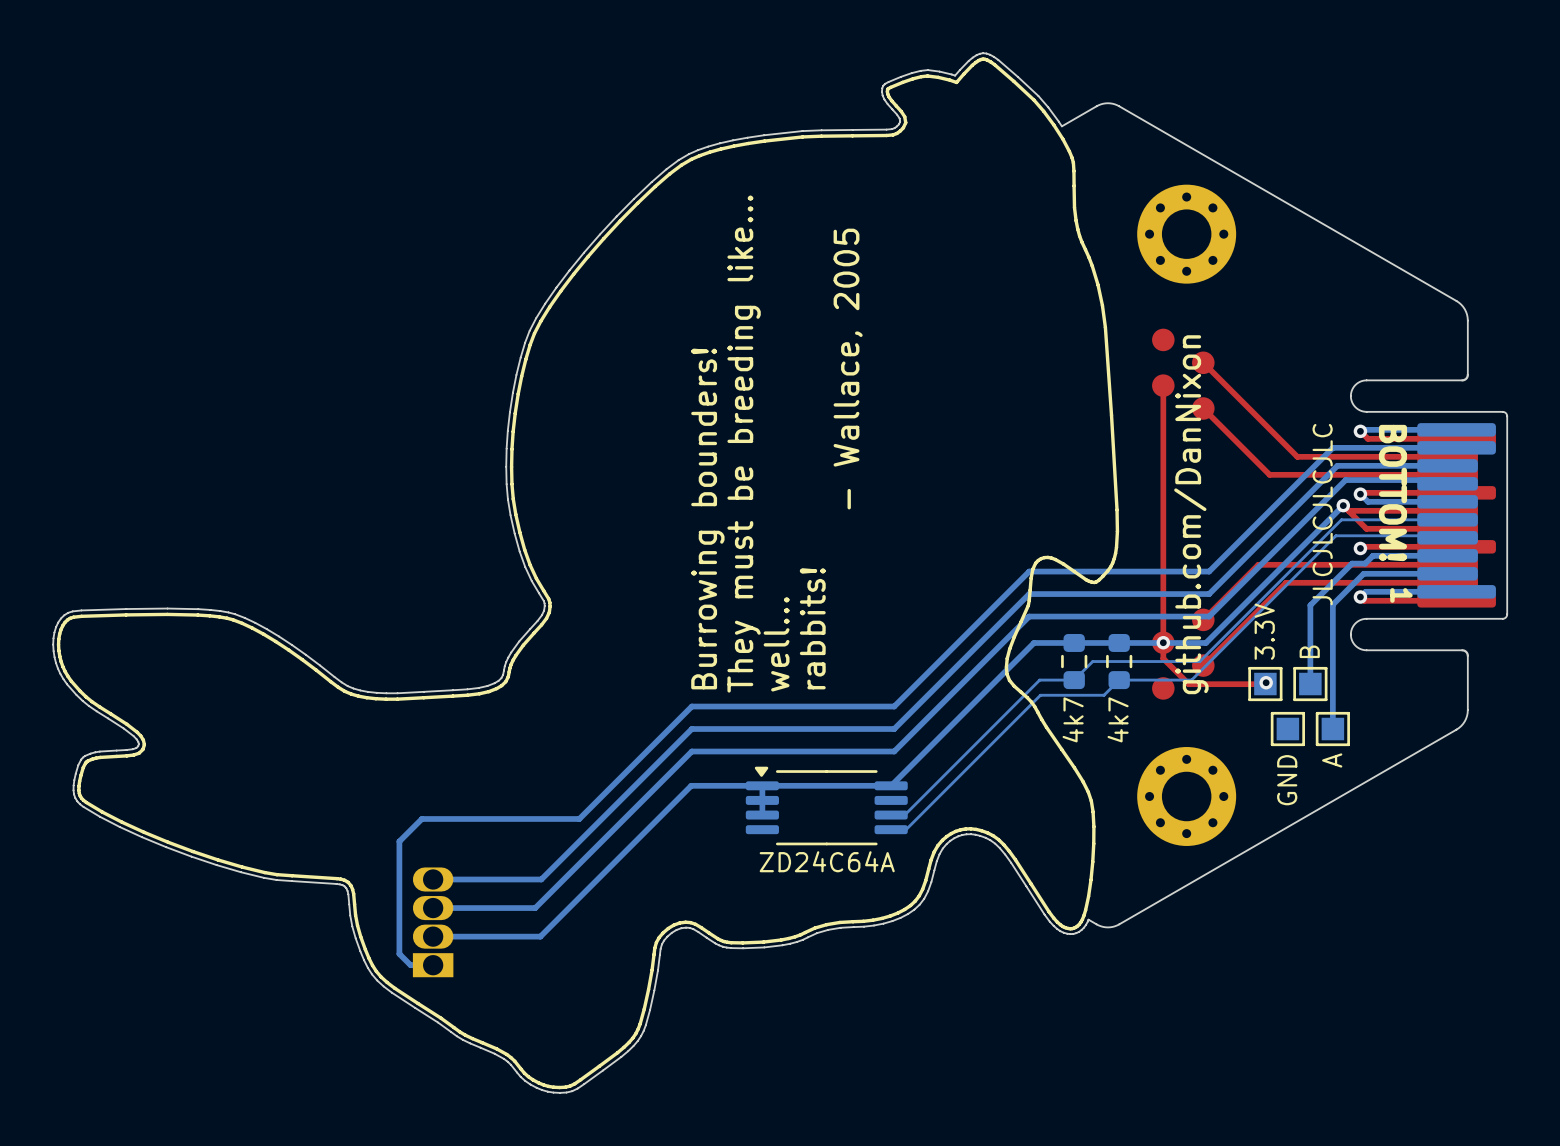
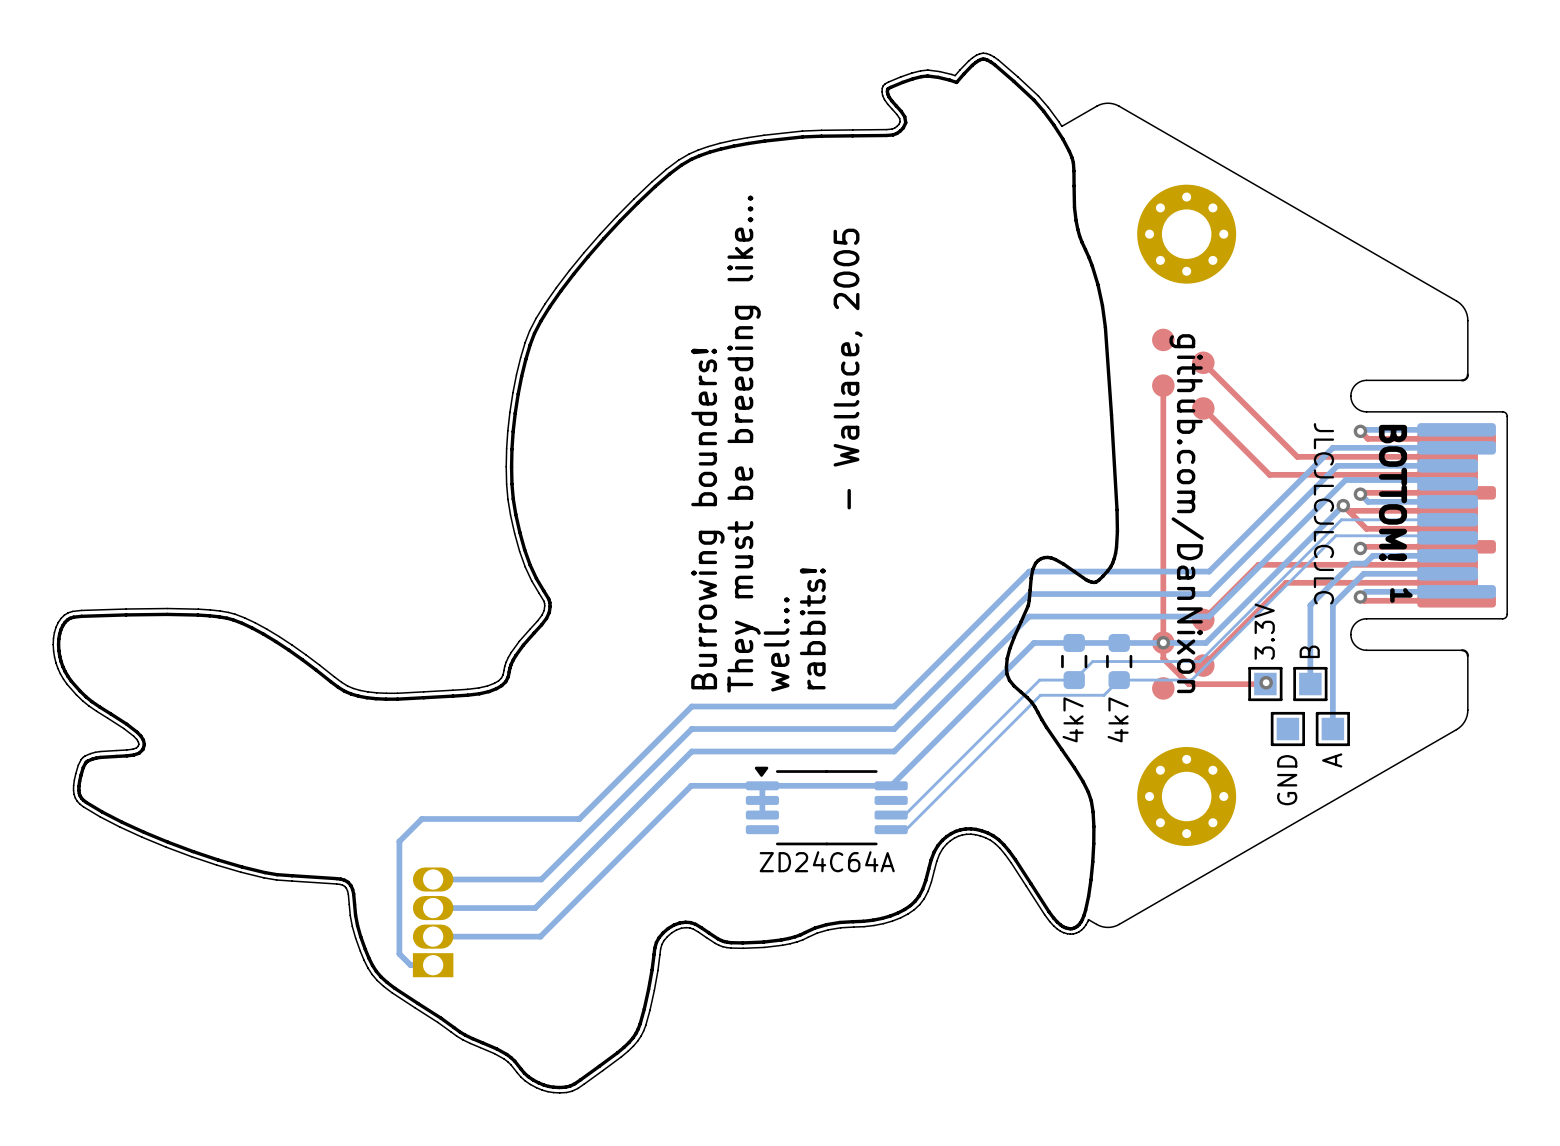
text rotation: 0° (1191, 514) -> 180° (1186, 513)
text rotation: 0° (1322, 514) -> 180° (1323, 513)

